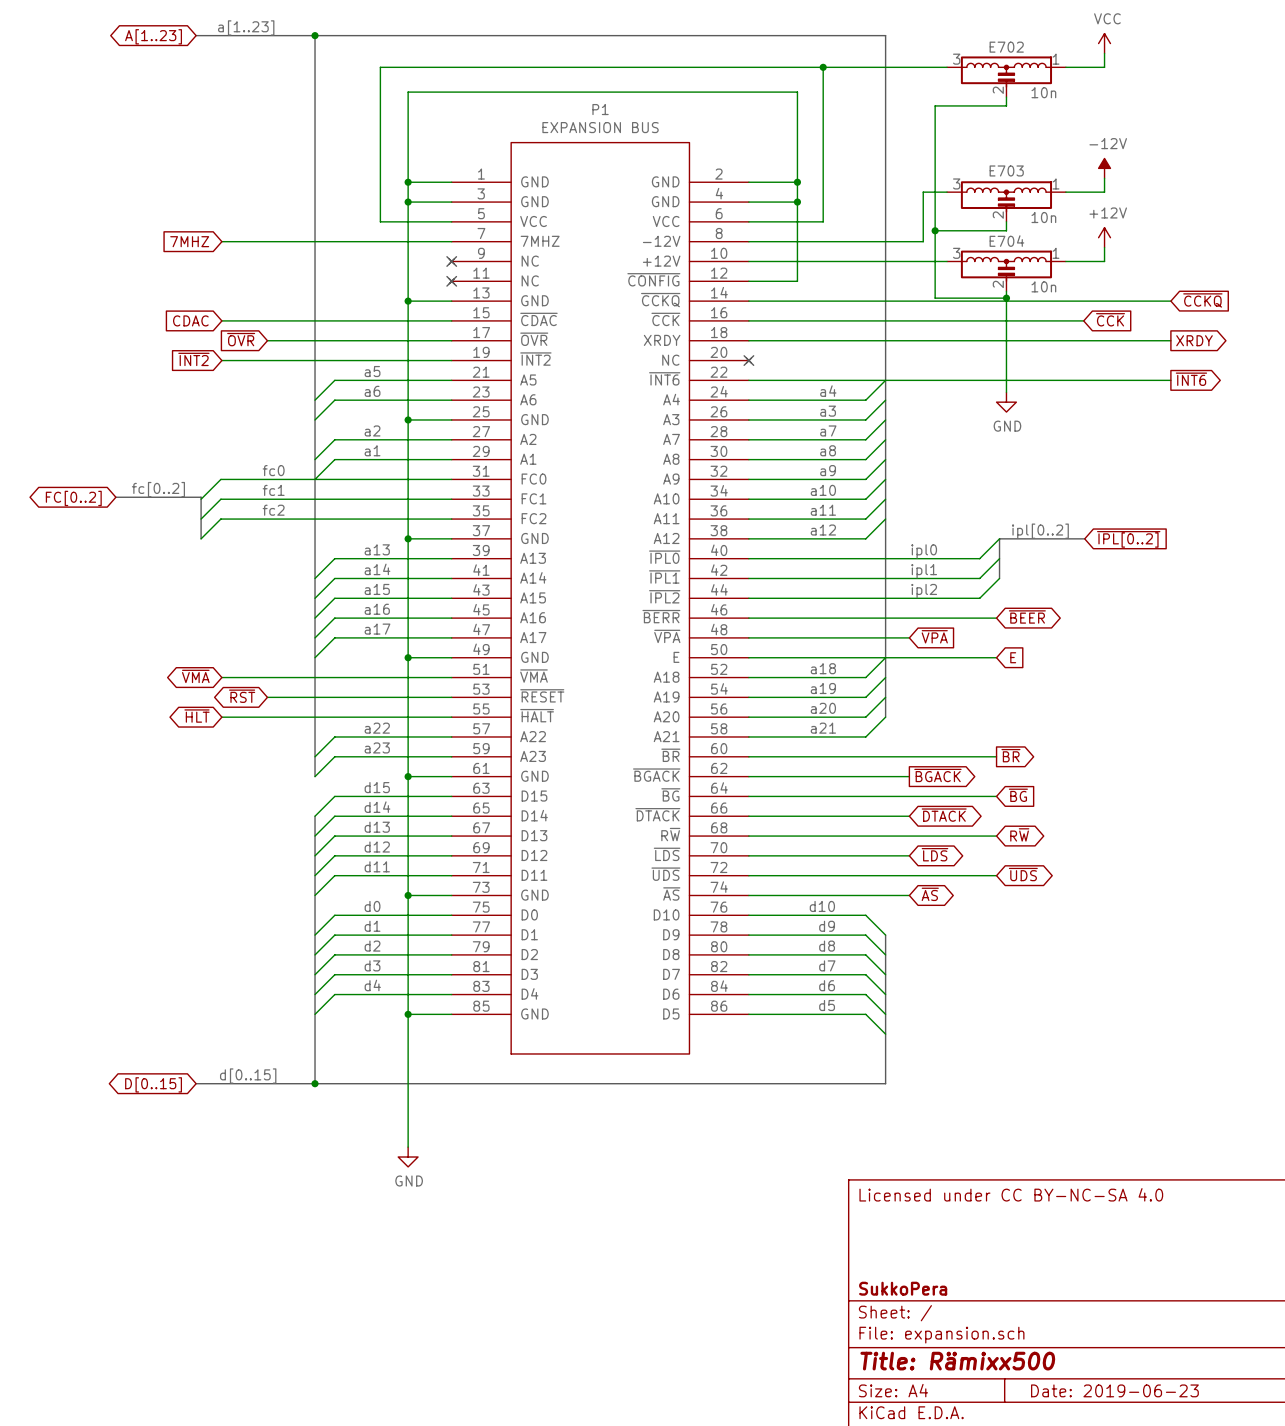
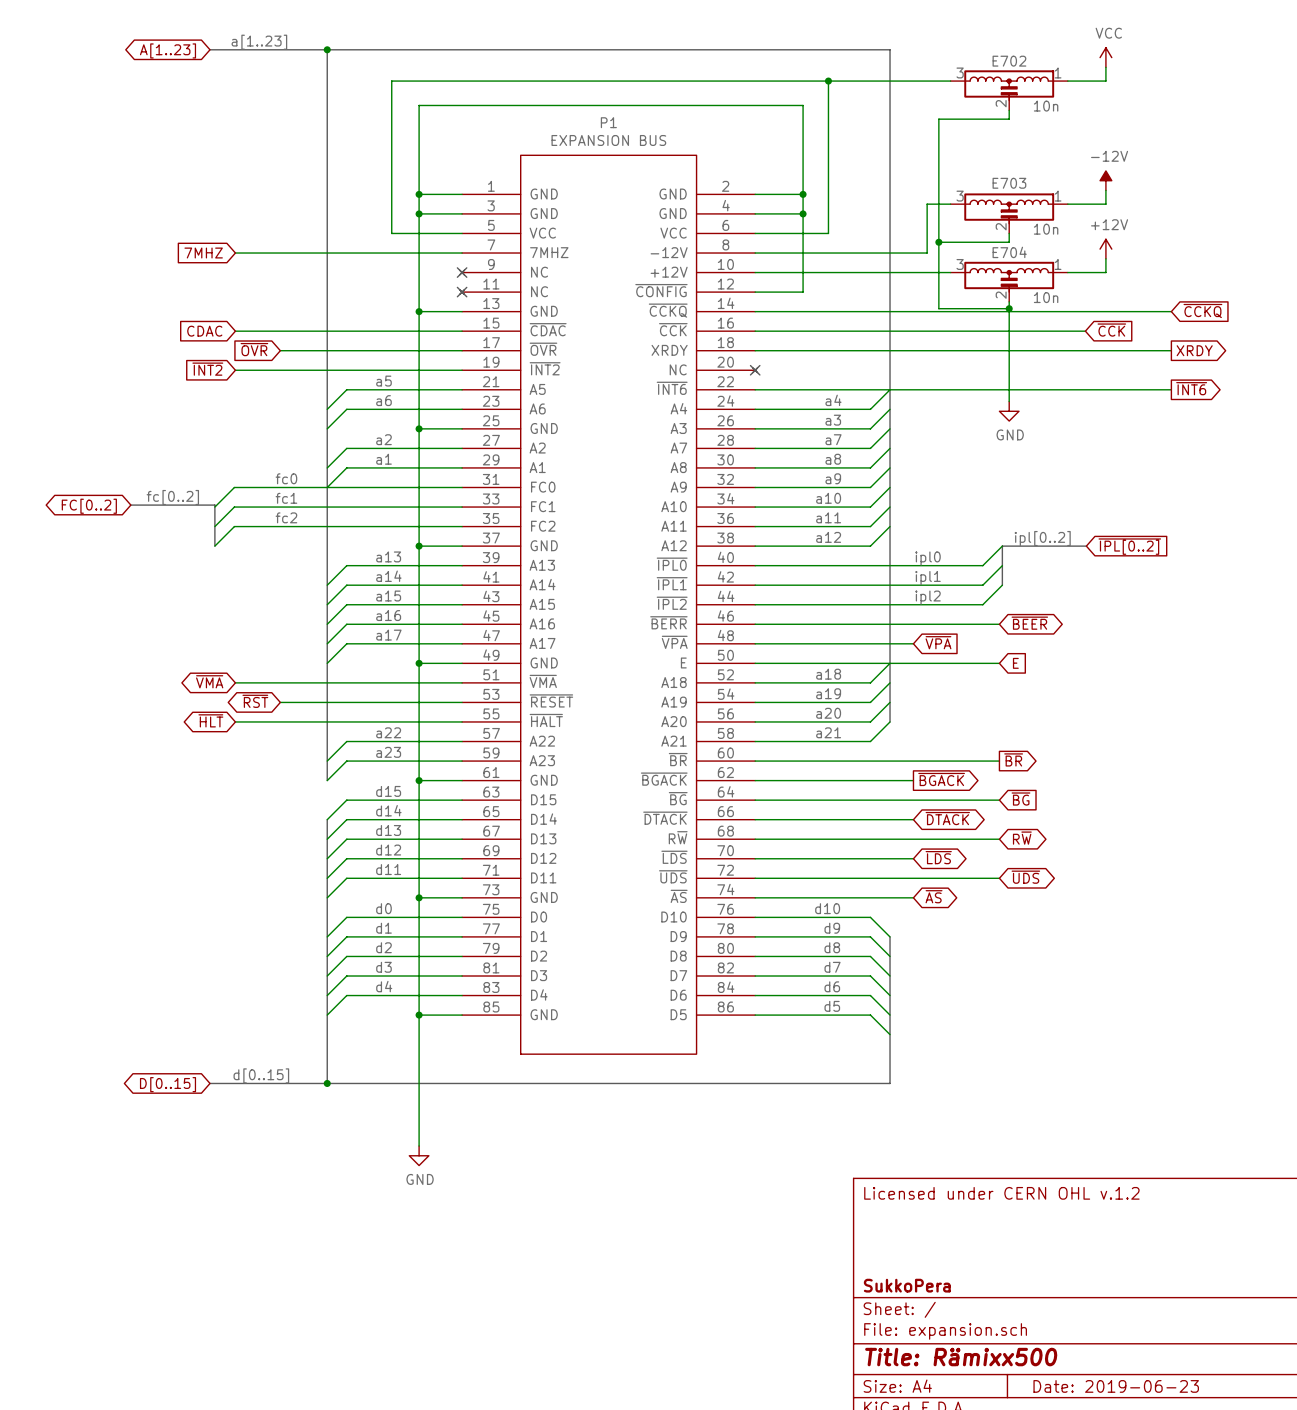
title block: Licensed under CC BY-NC-SA 4.0 (1011, 1194) -> Licensed under CERN OHL v.1.2 (1001, 1193)

